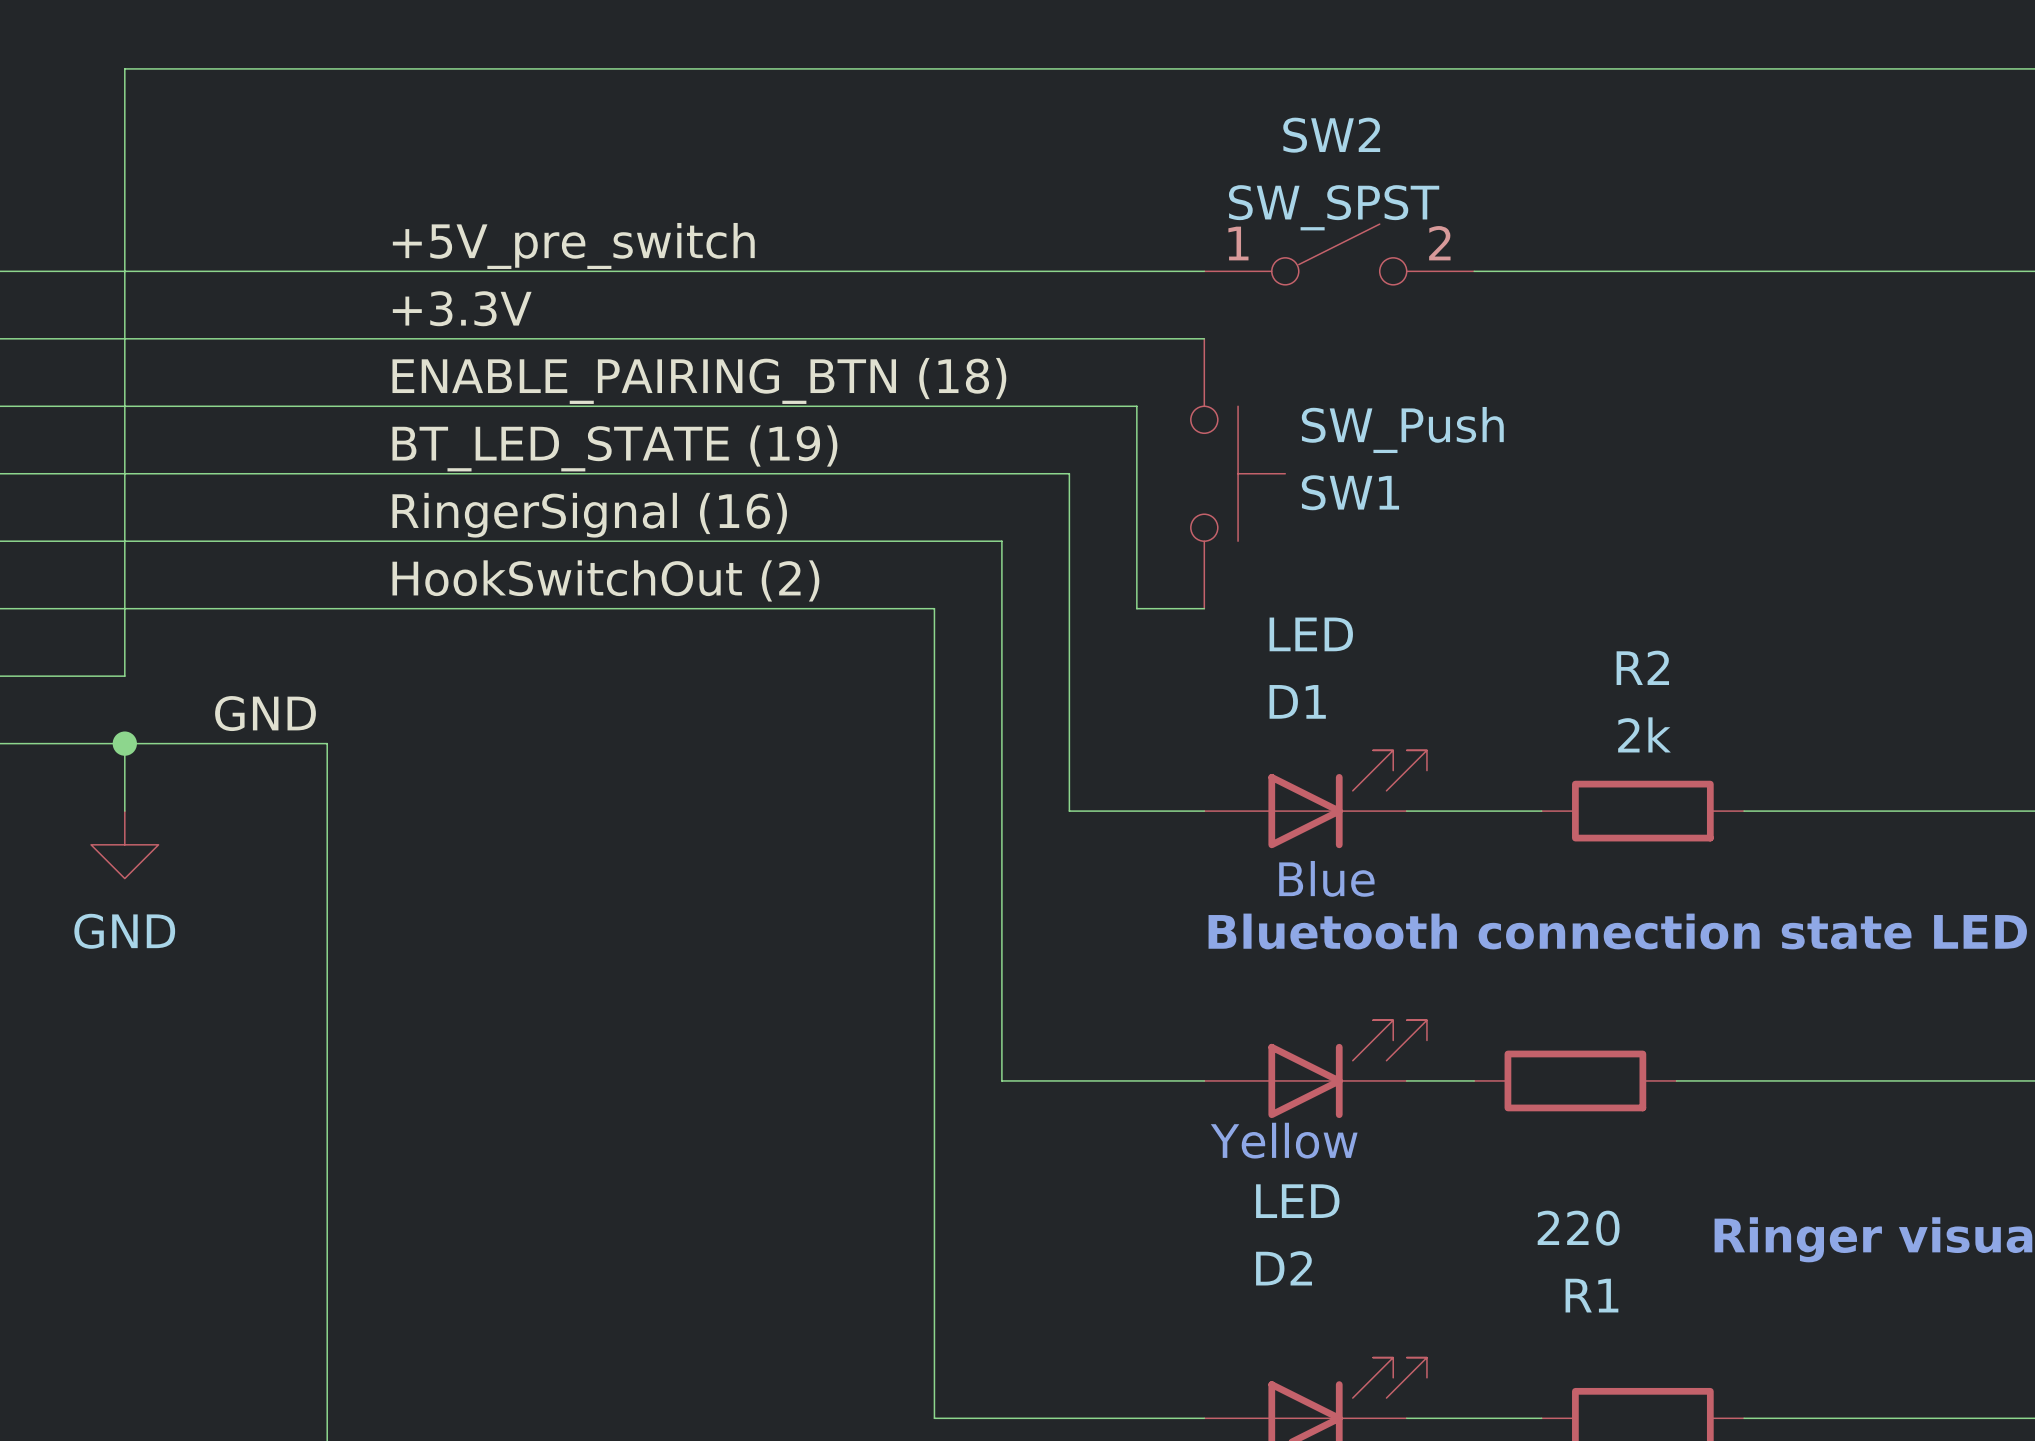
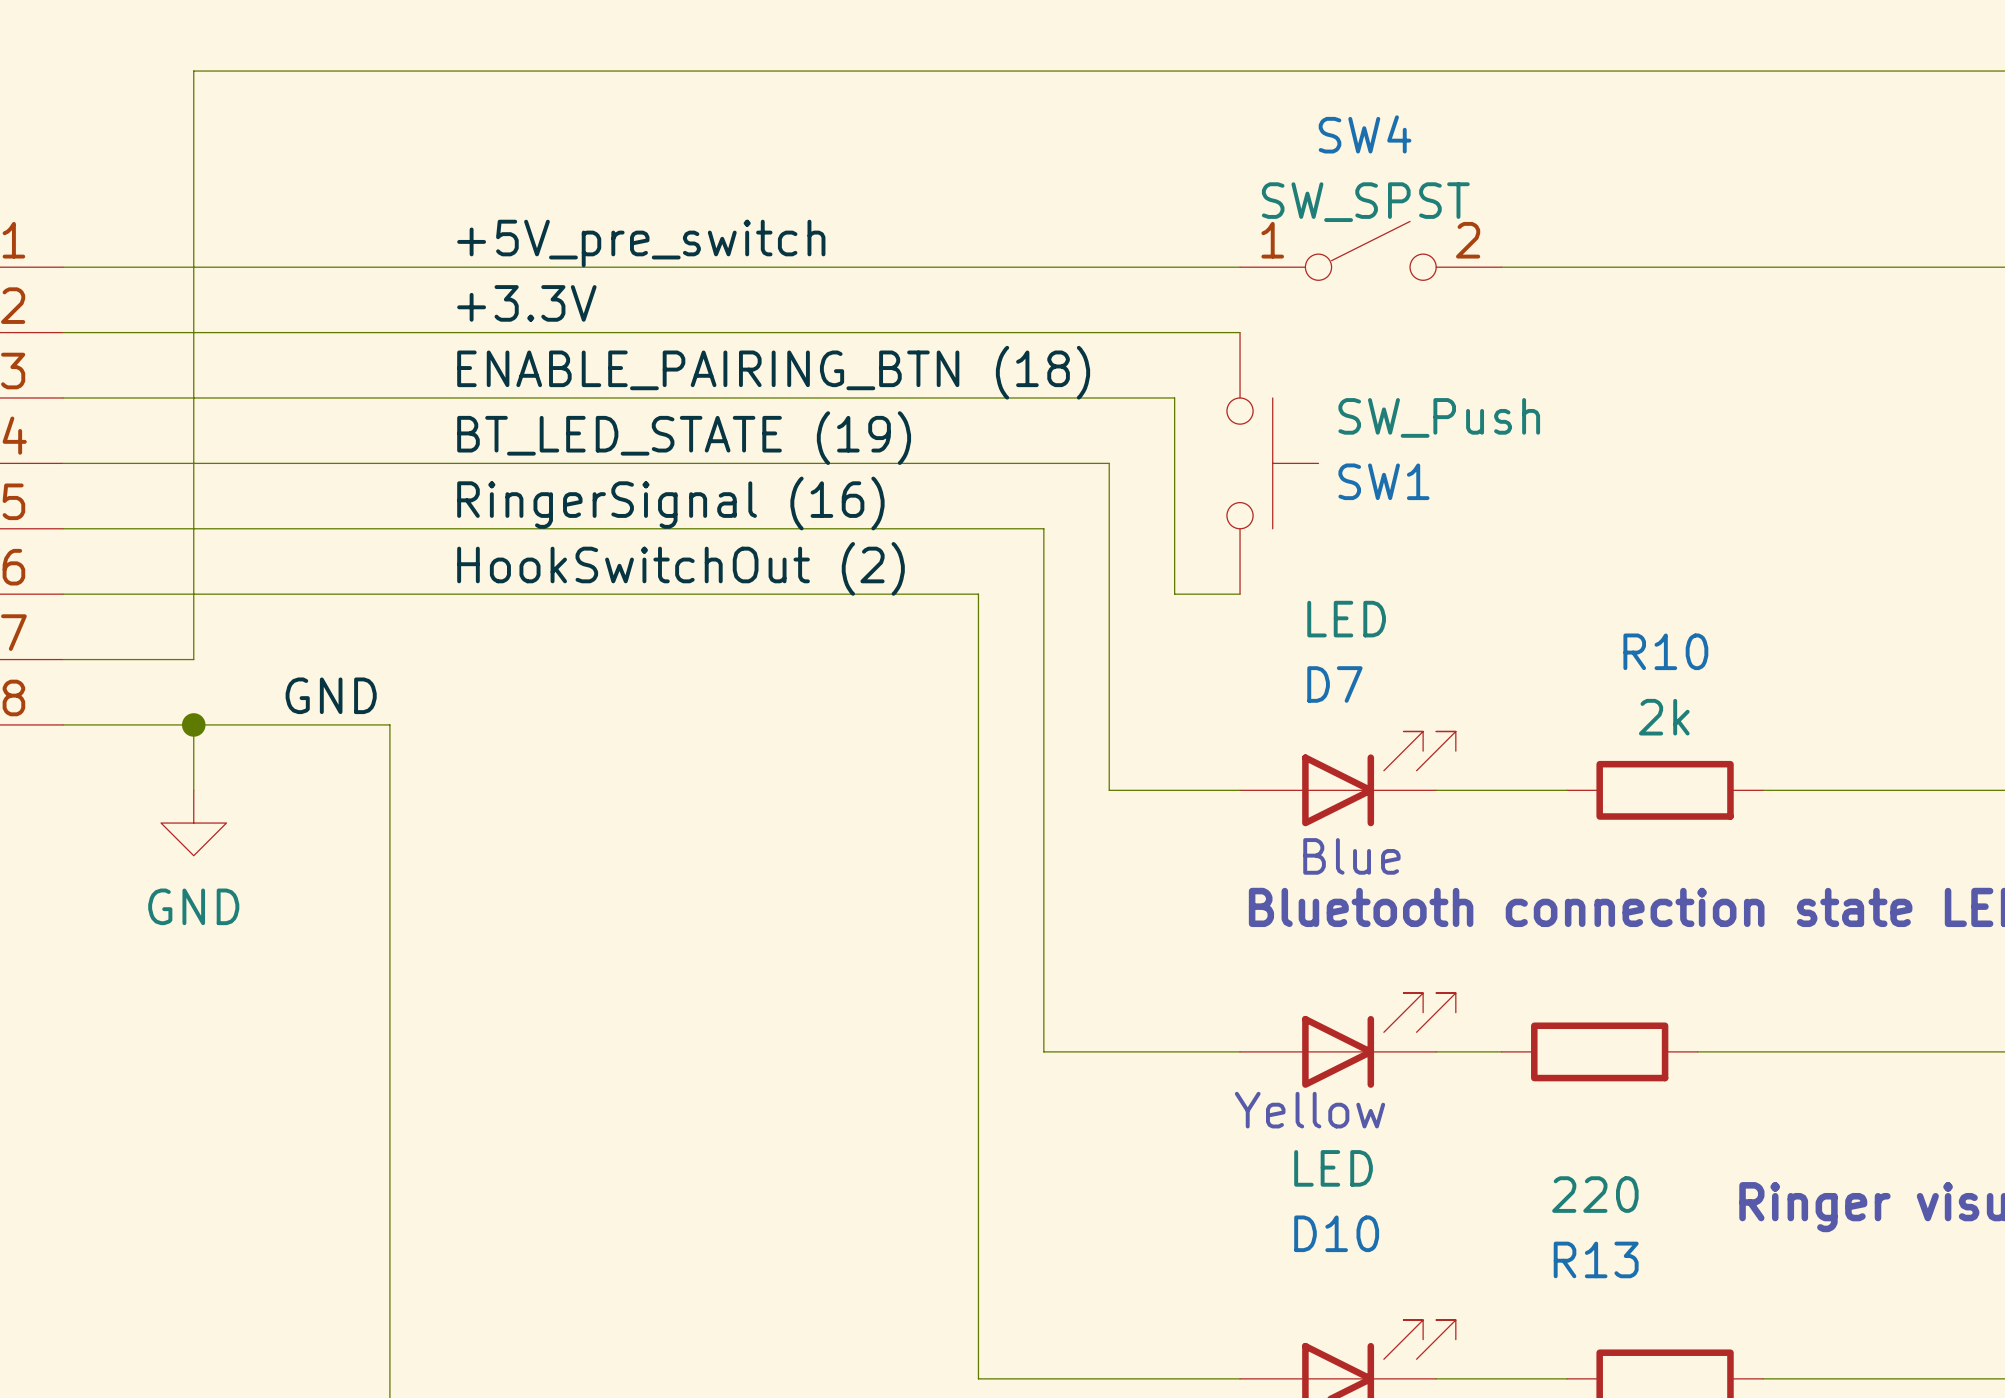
SW2 name: SW2 (1331, 135) -> SW4 (1365, 134)
R2 name: R2 (1642, 667) -> R10 (1665, 651)
D1 name: D1 (1297, 701) -> D7 (1334, 684)
D2 name: D2 (1284, 1268) -> D10 (1336, 1233)
R1 name: R1 (1591, 1295) -> R13 (1596, 1259)

